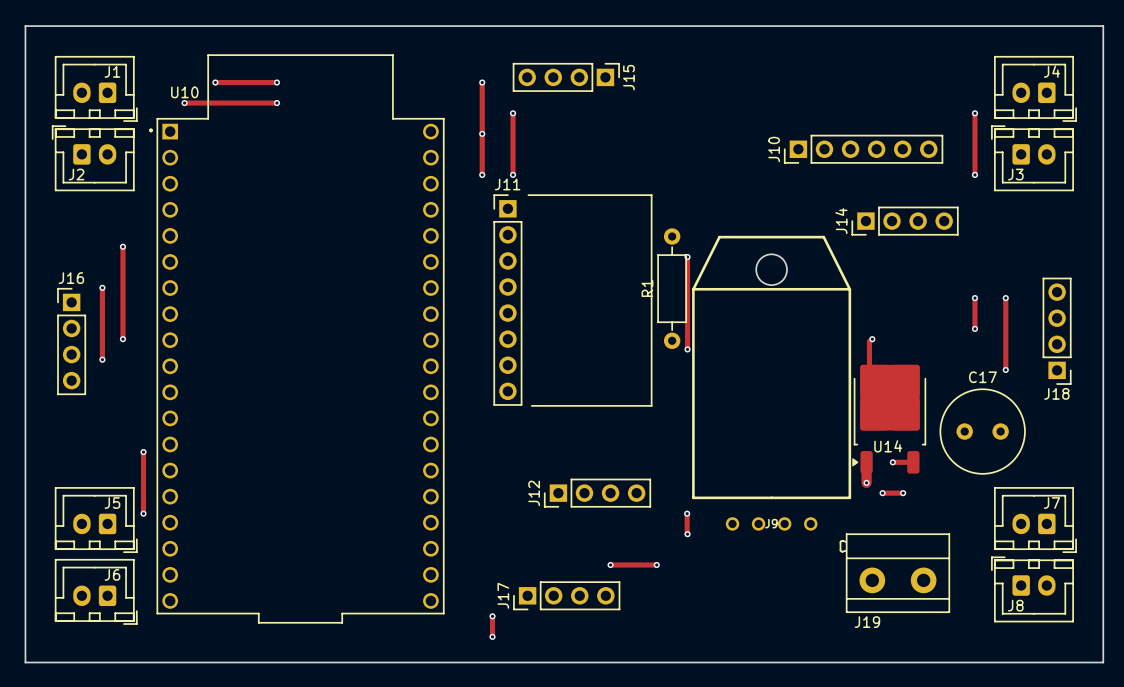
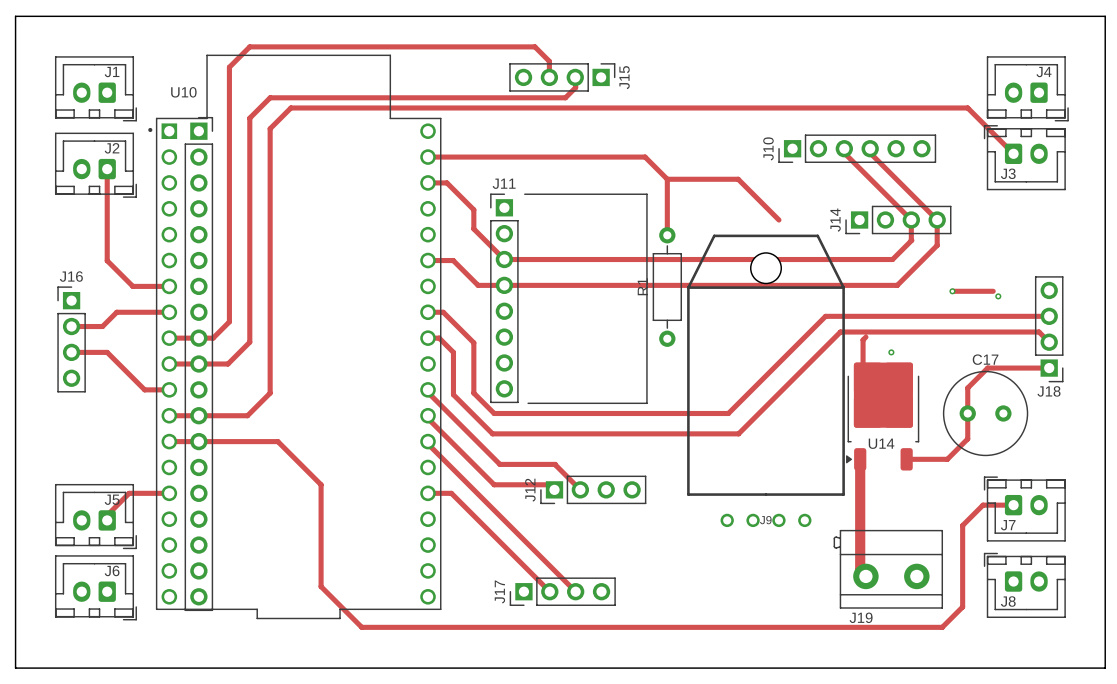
board edge: (25, 26) (1103, 26) (1103, 662) (25, 662) (25, 26) -> (15, 16) (15, 668) (1105, 668) (1105, 16) (15, 16)
track: none -> (549, 77) (549, 61) (534, 46) (249, 46) (229, 67) (229, 321) (213, 338) (169, 338)
track: none -> (575, 77) (575, 87) (565, 97) (270, 97) (249, 118) (249, 342) (228, 364) (169, 364)
track: (215, 82) (276, 82) -> none
via: (215, 82) -> none
via: (276, 82) -> none
track: (482, 82) (482, 174) -> none
via: (482, 82) -> none
track: (184, 103) (276, 103) -> none
via: (184, 103) -> none
via: (276, 103) -> none
track: (513, 113) (513, 174) -> none
via: (513, 113) -> none
track: (974, 113) (974, 174) -> none
via: (974, 113) -> none
via: (482, 133) -> none
track: none -> (844, 148) (844, 152) (911, 220) (911, 240) (892, 259) (504, 259) (473, 228) (473, 209) (446, 182) (428, 182)
track: none -> (870, 148) (870, 152) (937, 220) (937, 245) (897, 285) (478, 285) (453, 260) (428, 260)
track: none -> (1013, 153) (967, 107) (290, 107) (270, 128) (270, 393) (247, 415) (169, 415)
track: none -> (428, 157) (645, 157) (667, 179)
J2 rotation: 0° (93, 158) -> 180° (95, 165)
track: none -> (107, 169) (107, 260) (132, 286) (169, 286)
via: (482, 174) -> none
via: (513, 174) -> none
via: (974, 174) -> none
track: none -> (667, 179) (667, 235)
track: none -> (667, 179) (738, 179) (778, 220)
track: (122, 246) (122, 339) -> none
via: (122, 246) -> none
track: (687, 257) (687, 349) -> none
via: (687, 257) -> none
track: (102, 287) (102, 359) -> none
via: (102, 287) -> none
track: none -> (952, 291) (993, 291)
track: (974, 298) (974, 328) -> none
via position: (974, 298) -> (952, 291)
track: (1005, 298) (1005, 369) -> none
track: none -> (169, 312) (116, 312) (102, 326) (71, 326)
track: none -> (428, 312) (443, 312) (473, 342) (473, 393) (494, 413) (728, 413) (825, 316) (1049, 316)
via: (974, 328) -> none
via: (122, 339) -> none
via position: (872, 339) -> (891, 352)
track: none -> (428, 338) (439, 338) (453, 352) (453, 394) (492, 433) (738, 433) (840, 332) (1039, 332) (1049, 342)
via: (687, 349) -> none
track: none -> (71, 352) (107, 352) (144, 389) (169, 389)
via: (102, 359) -> none
part: none -> (198, 364)
via: (1005, 369) -> none
track: none -> (428, 389) (428, 392) (499, 464) (555, 464) (580, 489)
track: none -> (428, 415) (428, 418) (494, 484) (549, 484) (554, 489)
C17 position: (982, 431) -> (985, 413)
track: none -> (169, 441) (277, 441) (321, 484) (321, 586) (361, 627) (942, 627) (962, 606) (962, 525) (983, 505) (1013, 505)
track: none -> (428, 441) (428, 444) (575, 591)
track: (143, 452) (143, 513) -> none
via: (143, 452) -> none
track: (892, 462) (913, 462) -> (1049, 368) (987, 368) (967, 388) (967, 438) (947, 459) (906, 459)
via: (892, 462) -> none
track: none -> (860, 479) (860, 570) (865, 576)
via: (866, 482) -> none
track: (882, 493) (903, 493) -> none
via: (882, 493) -> none
via: (903, 493) -> none
track: none -> (169, 493) (129, 493) (107, 515) (107, 520)
track: none -> (428, 493) (451, 493) (549, 591)
via: (143, 513) -> none
track: (687, 513) (687, 534) -> none
via: (687, 513) -> none
J7 rotation: 0° (1035, 520) -> 180° (1024, 509)
via: (687, 534) -> none
track: (610, 564) (656, 564) -> none
via: (610, 564) -> none
via: (656, 564) -> none
track: (492, 616) (492, 636) -> none
via: (492, 616) -> none
via: (492, 636) -> none

